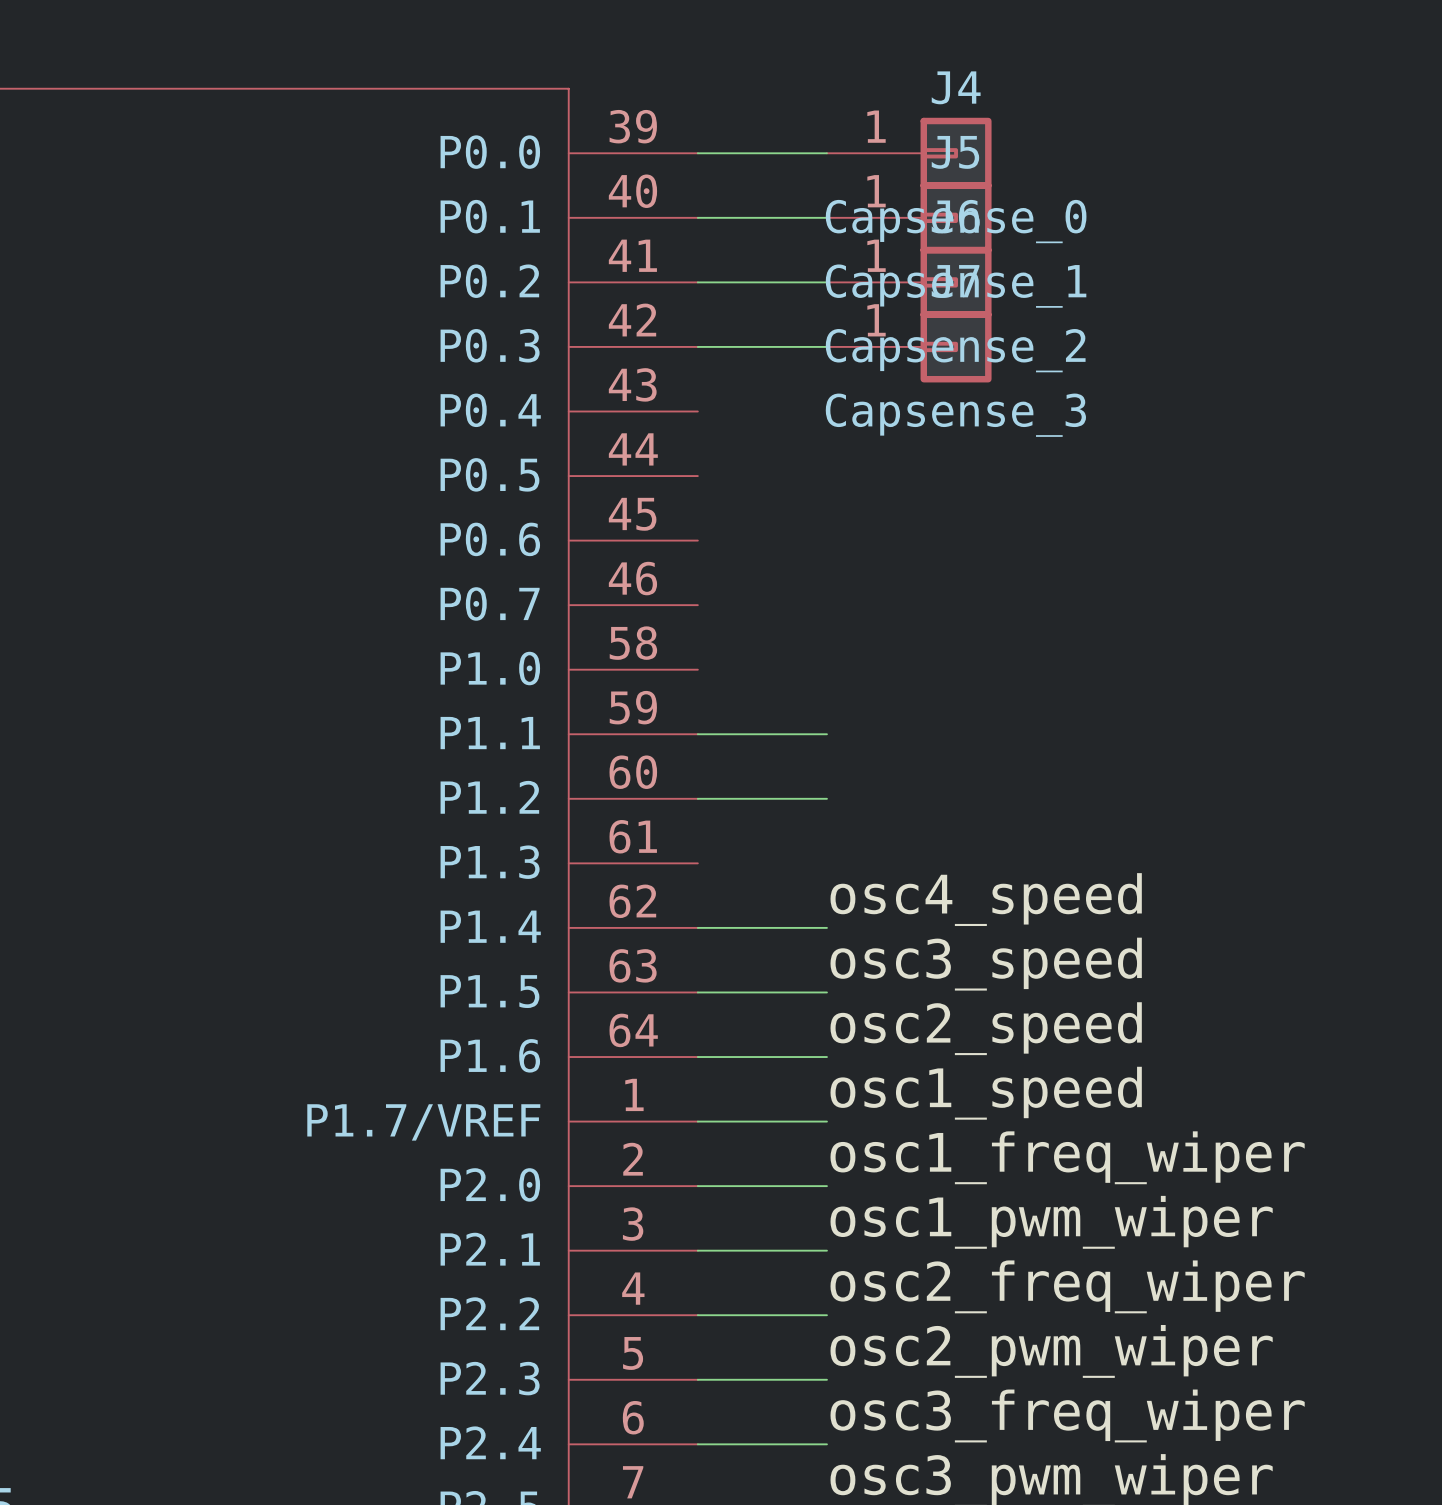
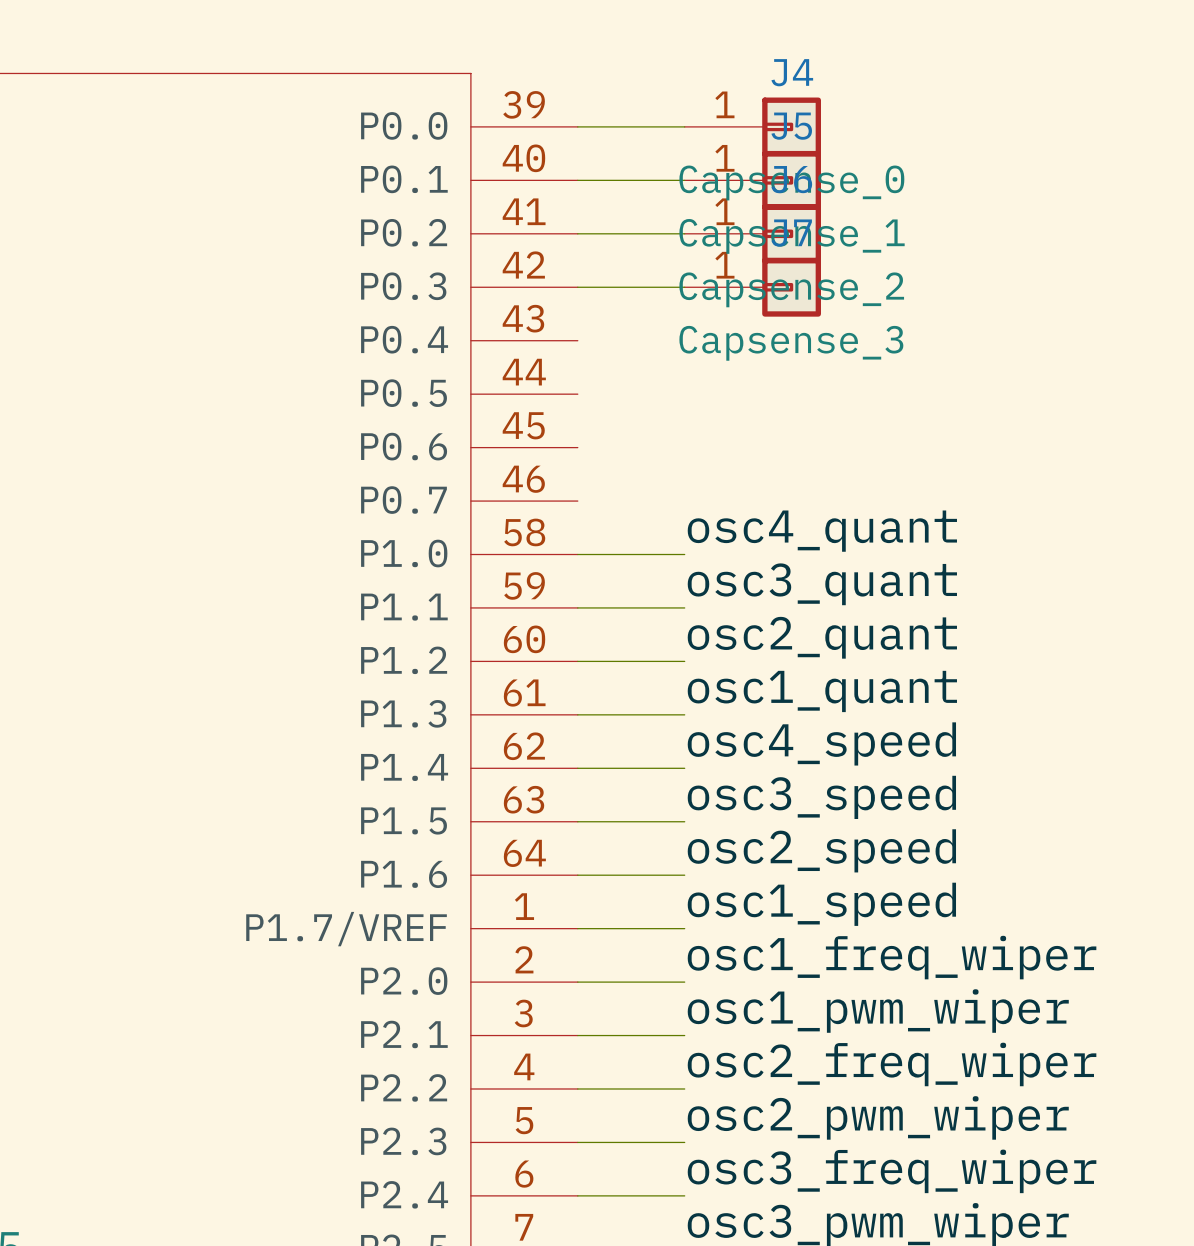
label: none -> osc4_quant (822, 531)
wire: none -> (577, 554) (684, 554)
label: none -> osc3_quant (822, 584)
label: none -> osc2_quant (822, 637)
label: none -> osc1_quant (822, 691)
wire: none -> (577, 714) (684, 714)

